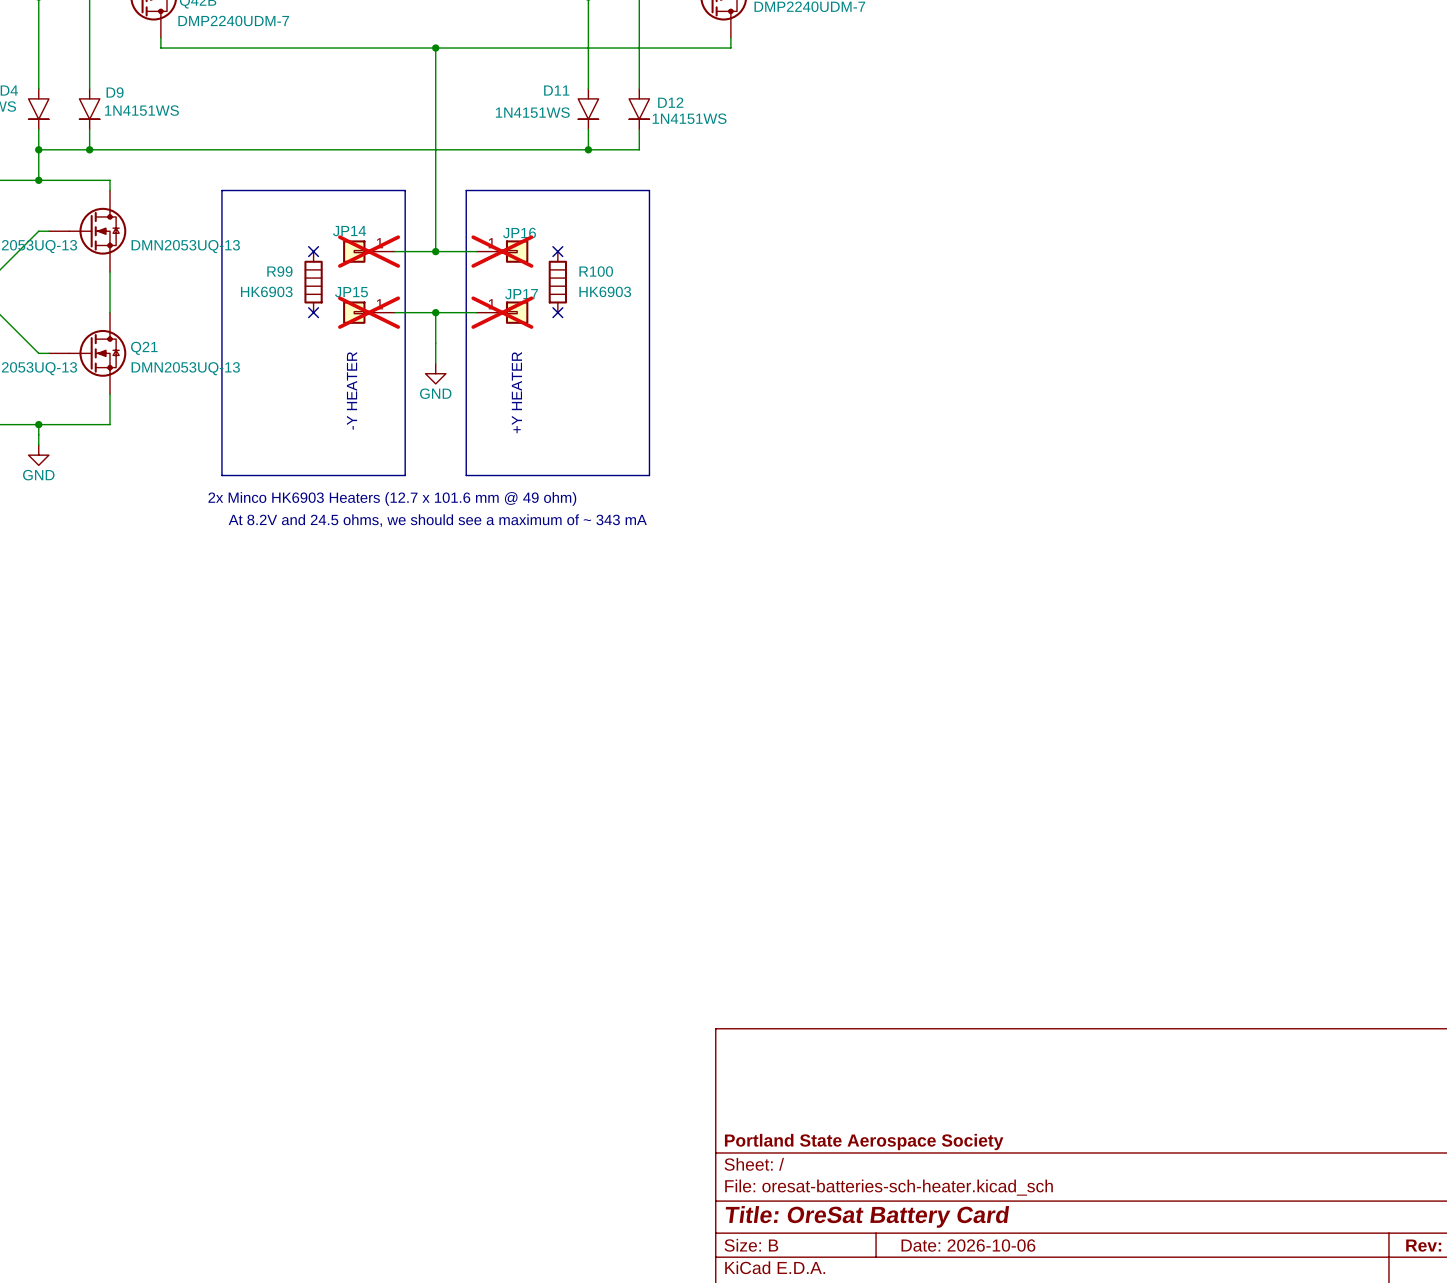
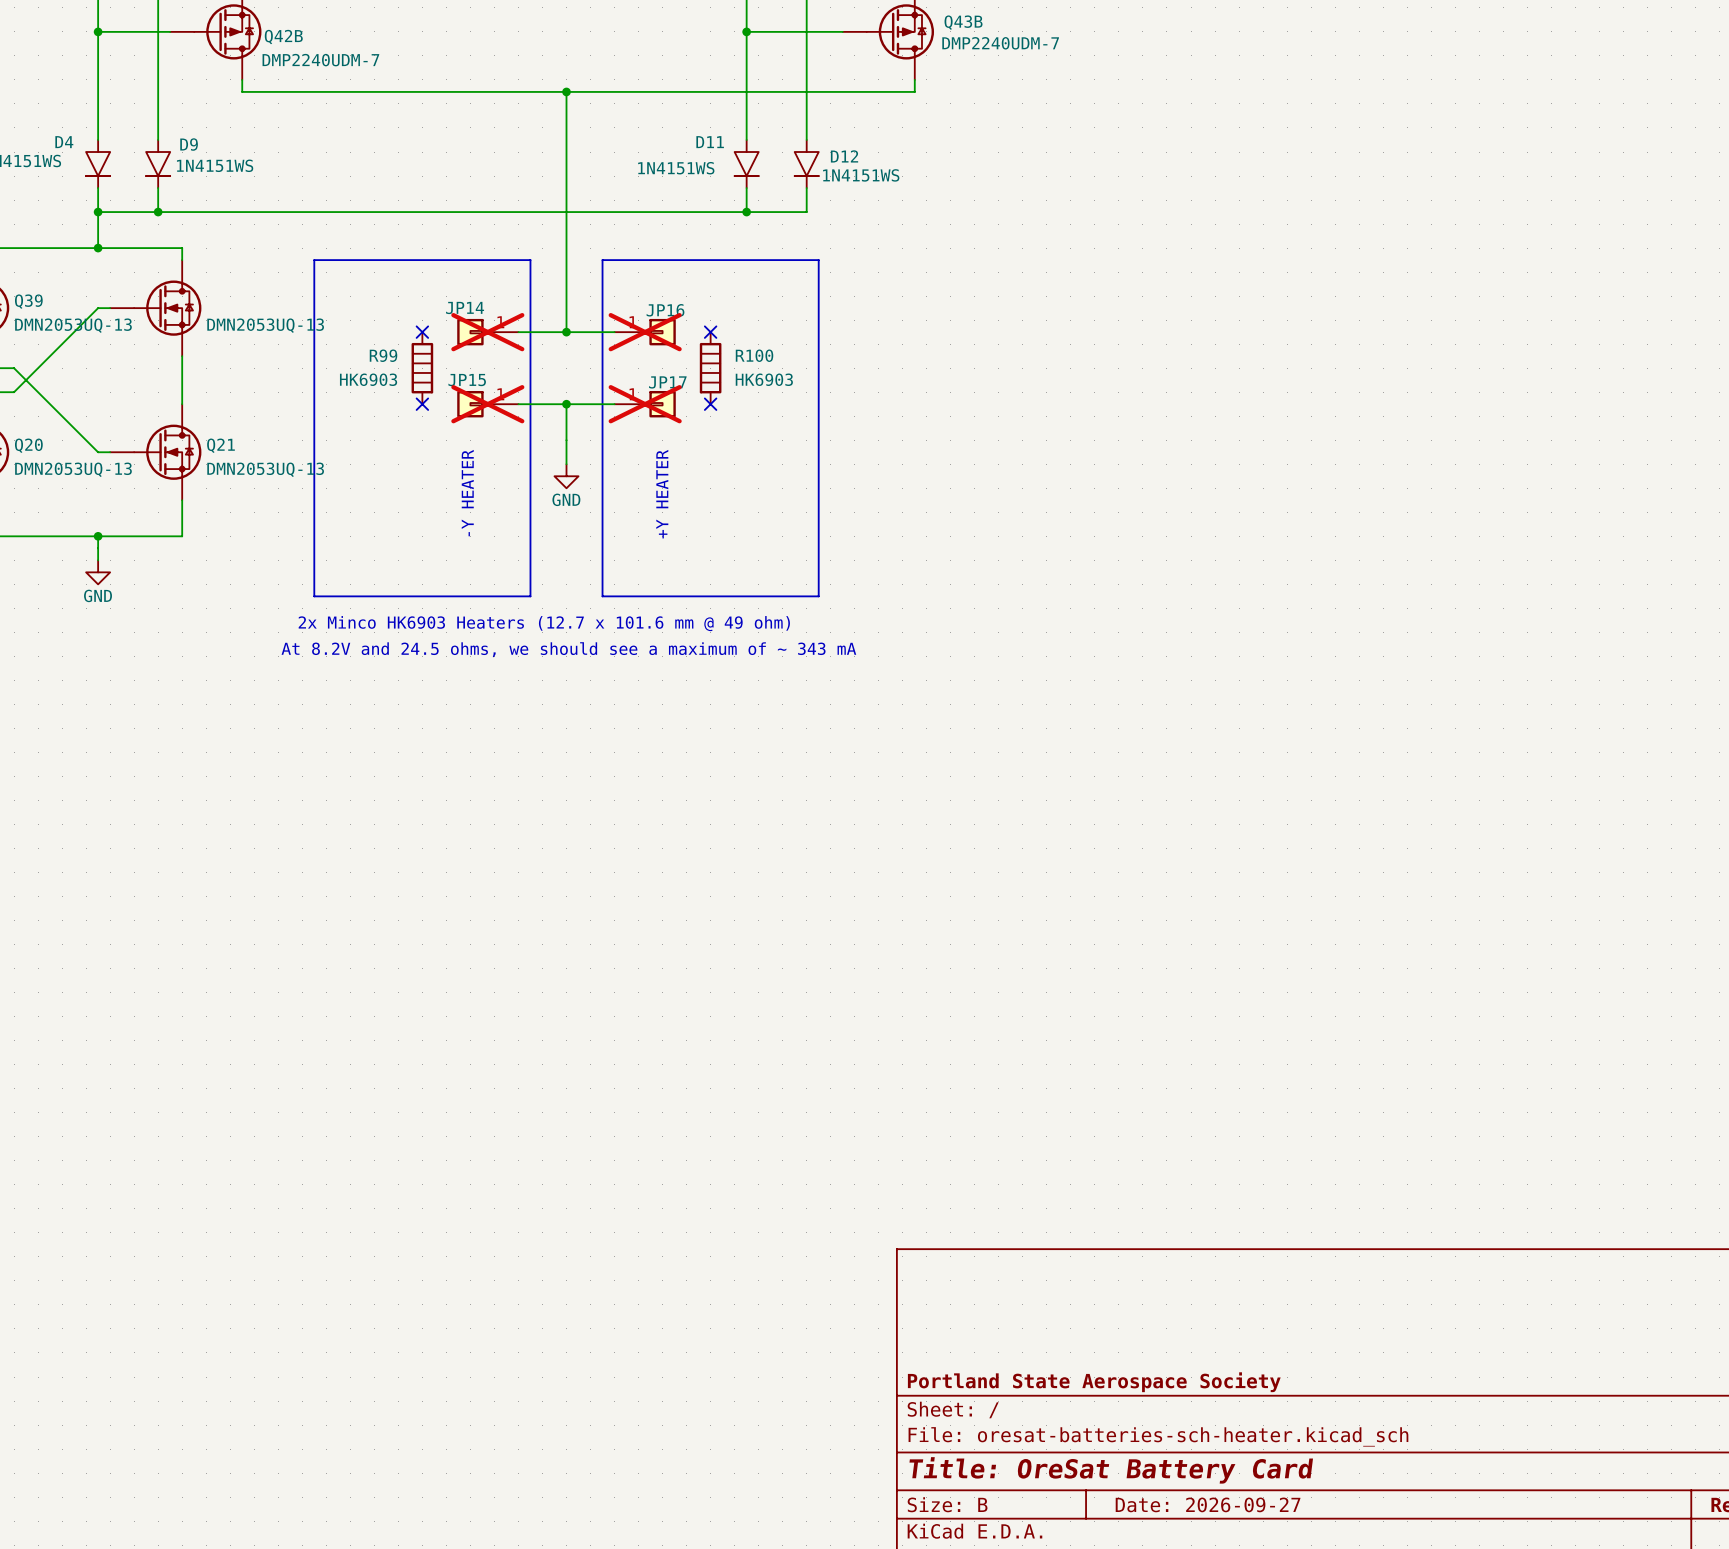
title block: Date: 2026-10-06 (968, 1245) -> Date: 2026-09-27 (1208, 1504)

